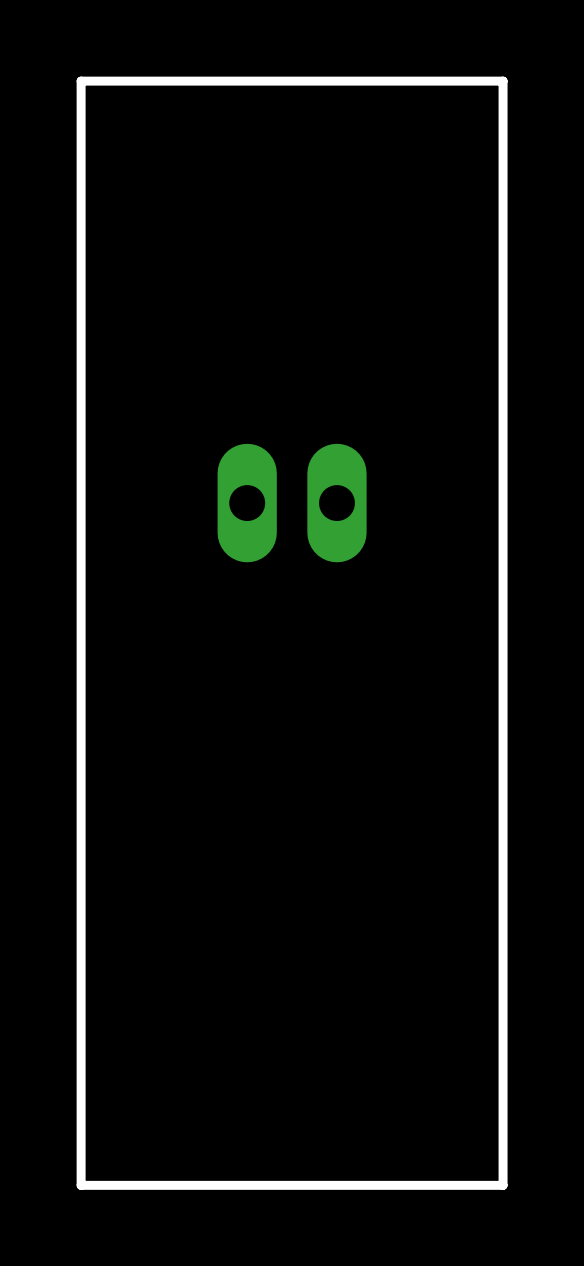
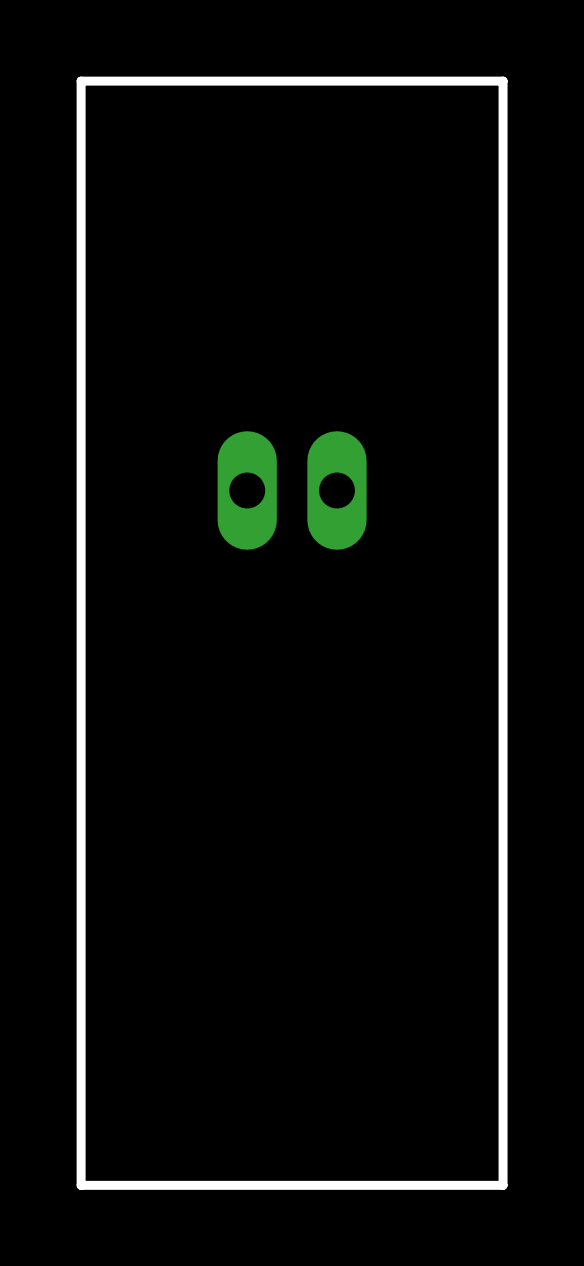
part position: (292, 503) -> (292, 490)

